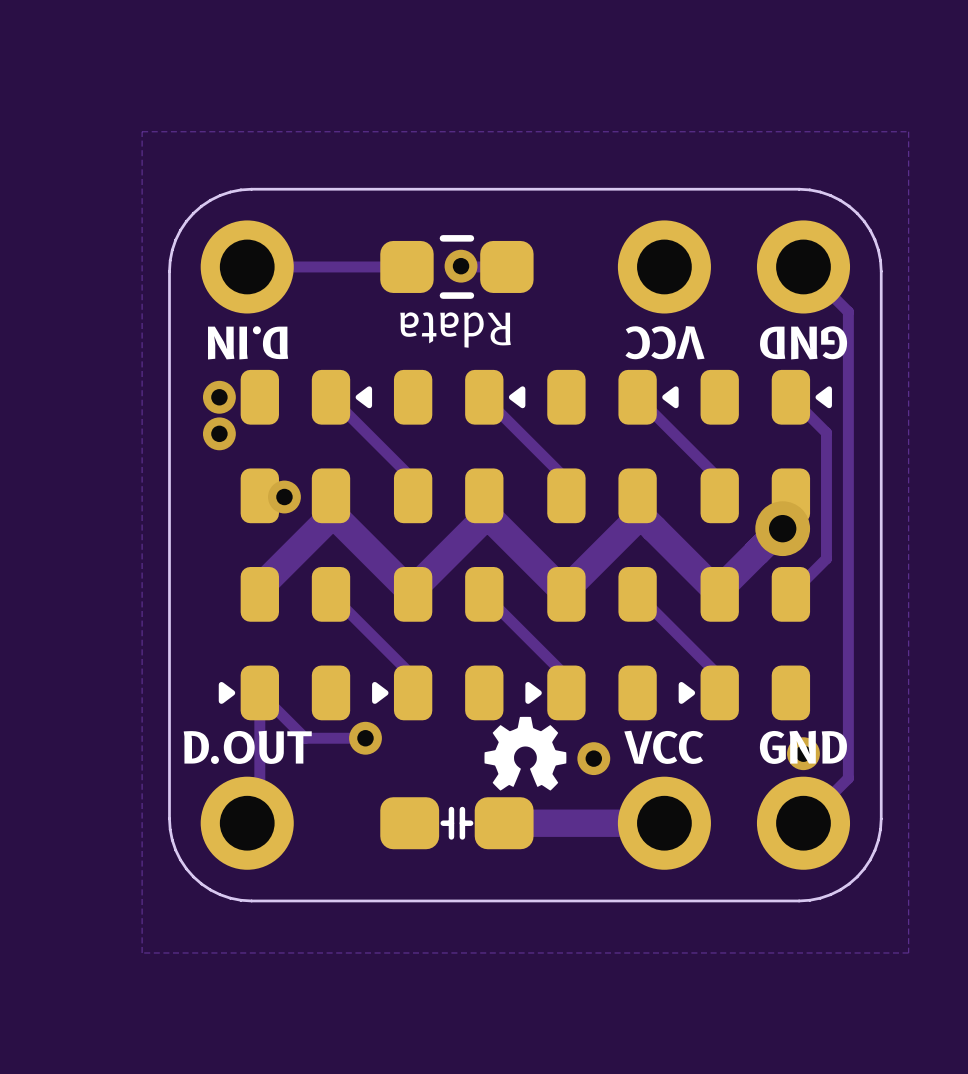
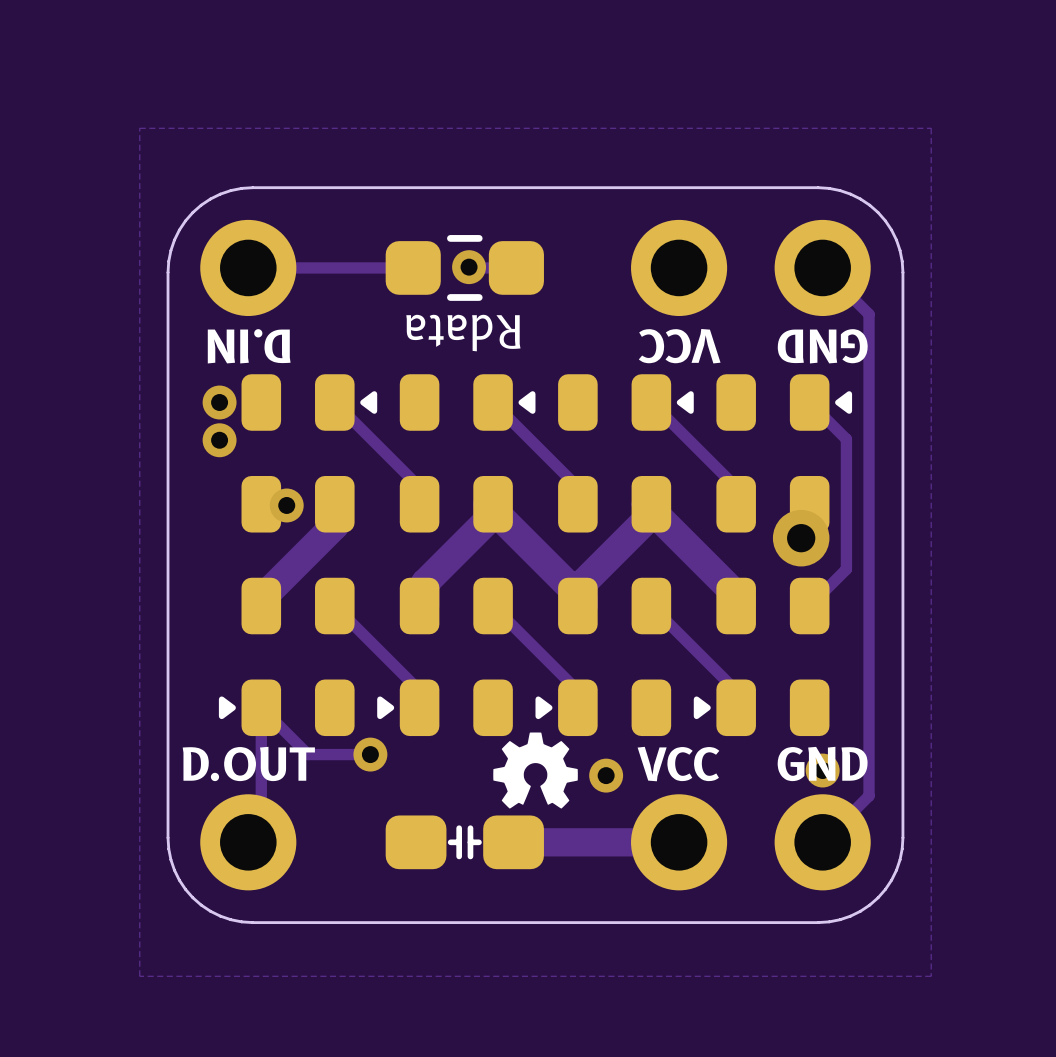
track: (484, 495) (484, 518) (413, 589) (413, 594) (331, 512) -> none
track: none -> (645, 504) (741, 600)
track: (637, 495) (637, 518) (566, 589) (566, 594) (484, 512) -> none
track: none -> (648, 507) (648, 517) (583, 582) (583, 606)
track: (637, 512) (719, 594) (719, 589) (790, 518) -> none
track: none -> (583, 600) (487, 504) (487, 520) (425, 582) (425, 606)

